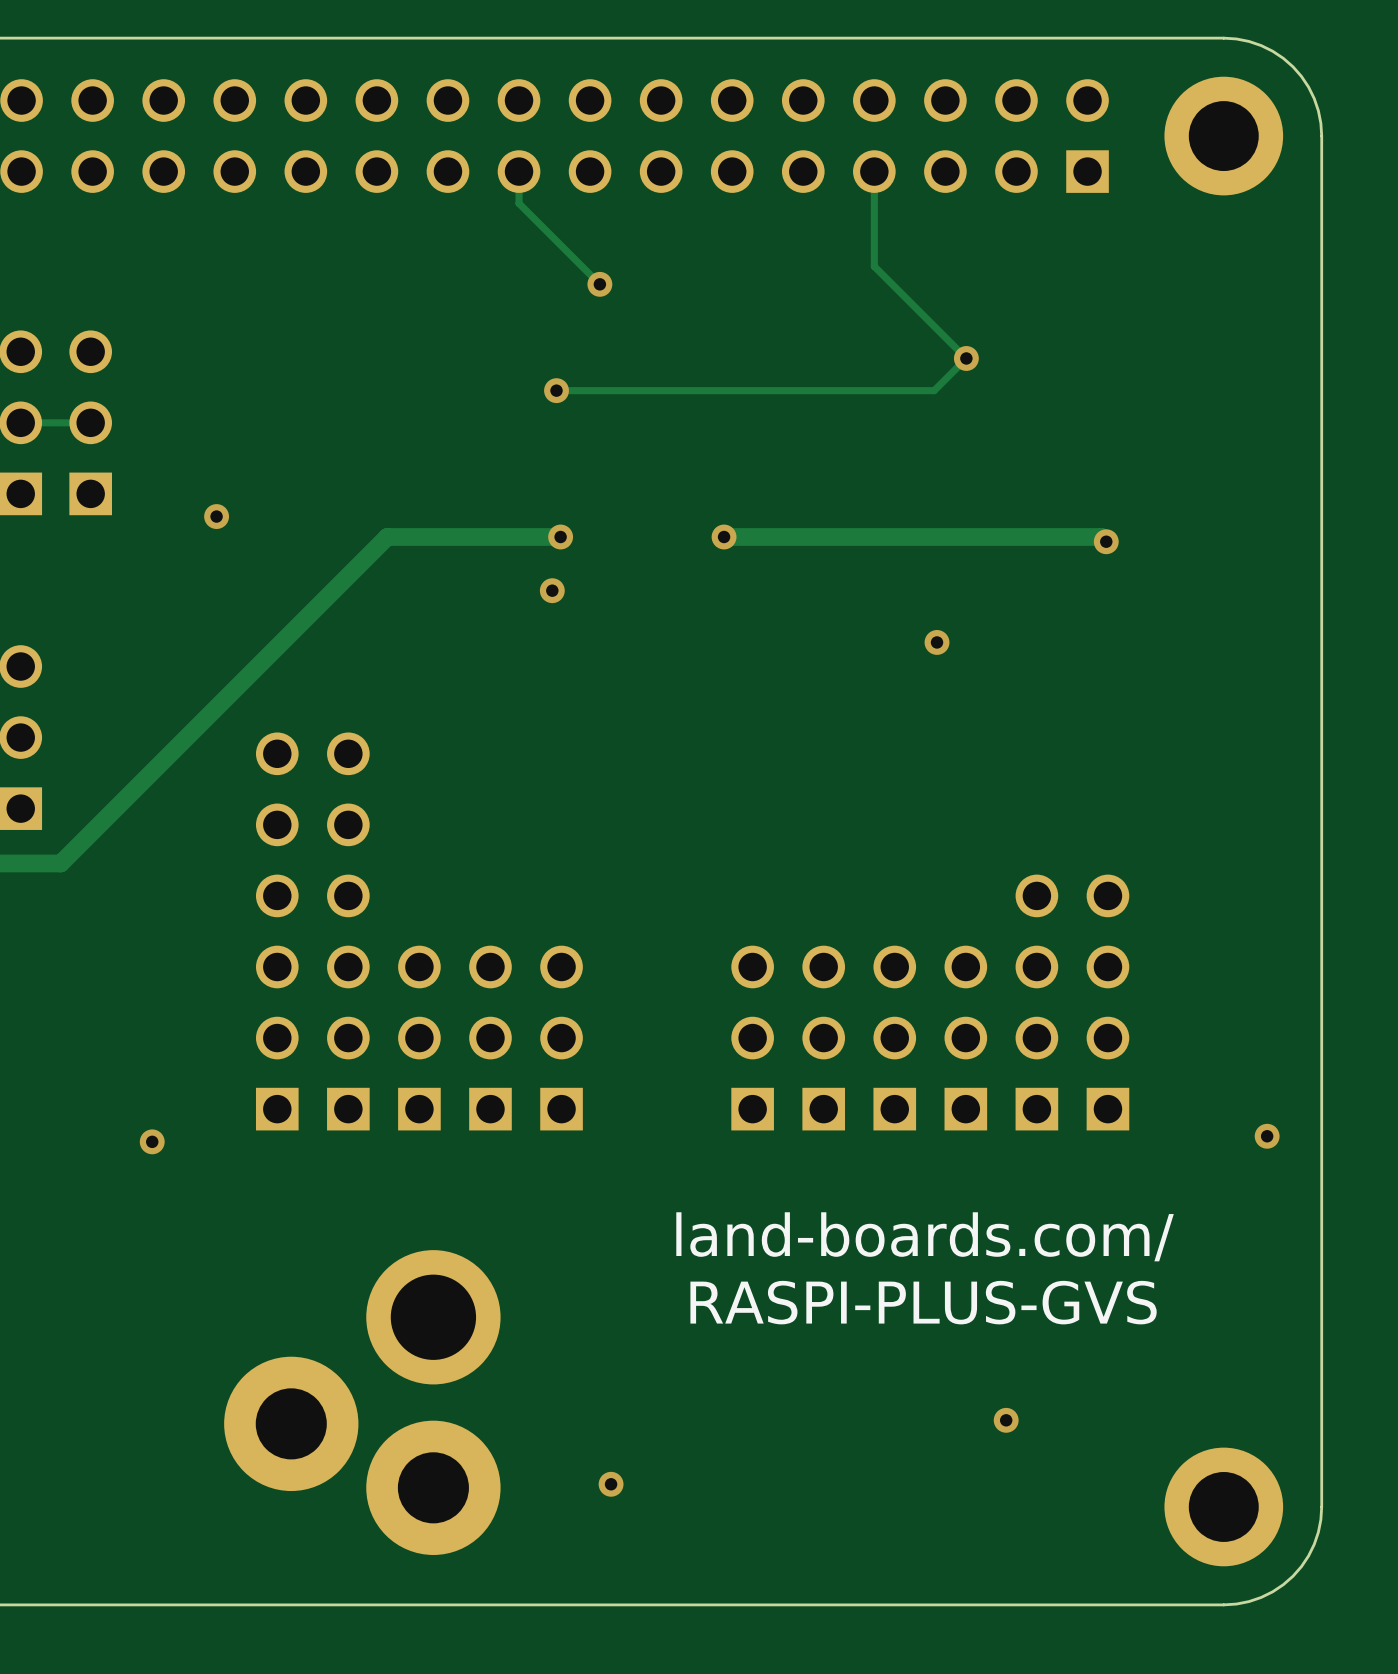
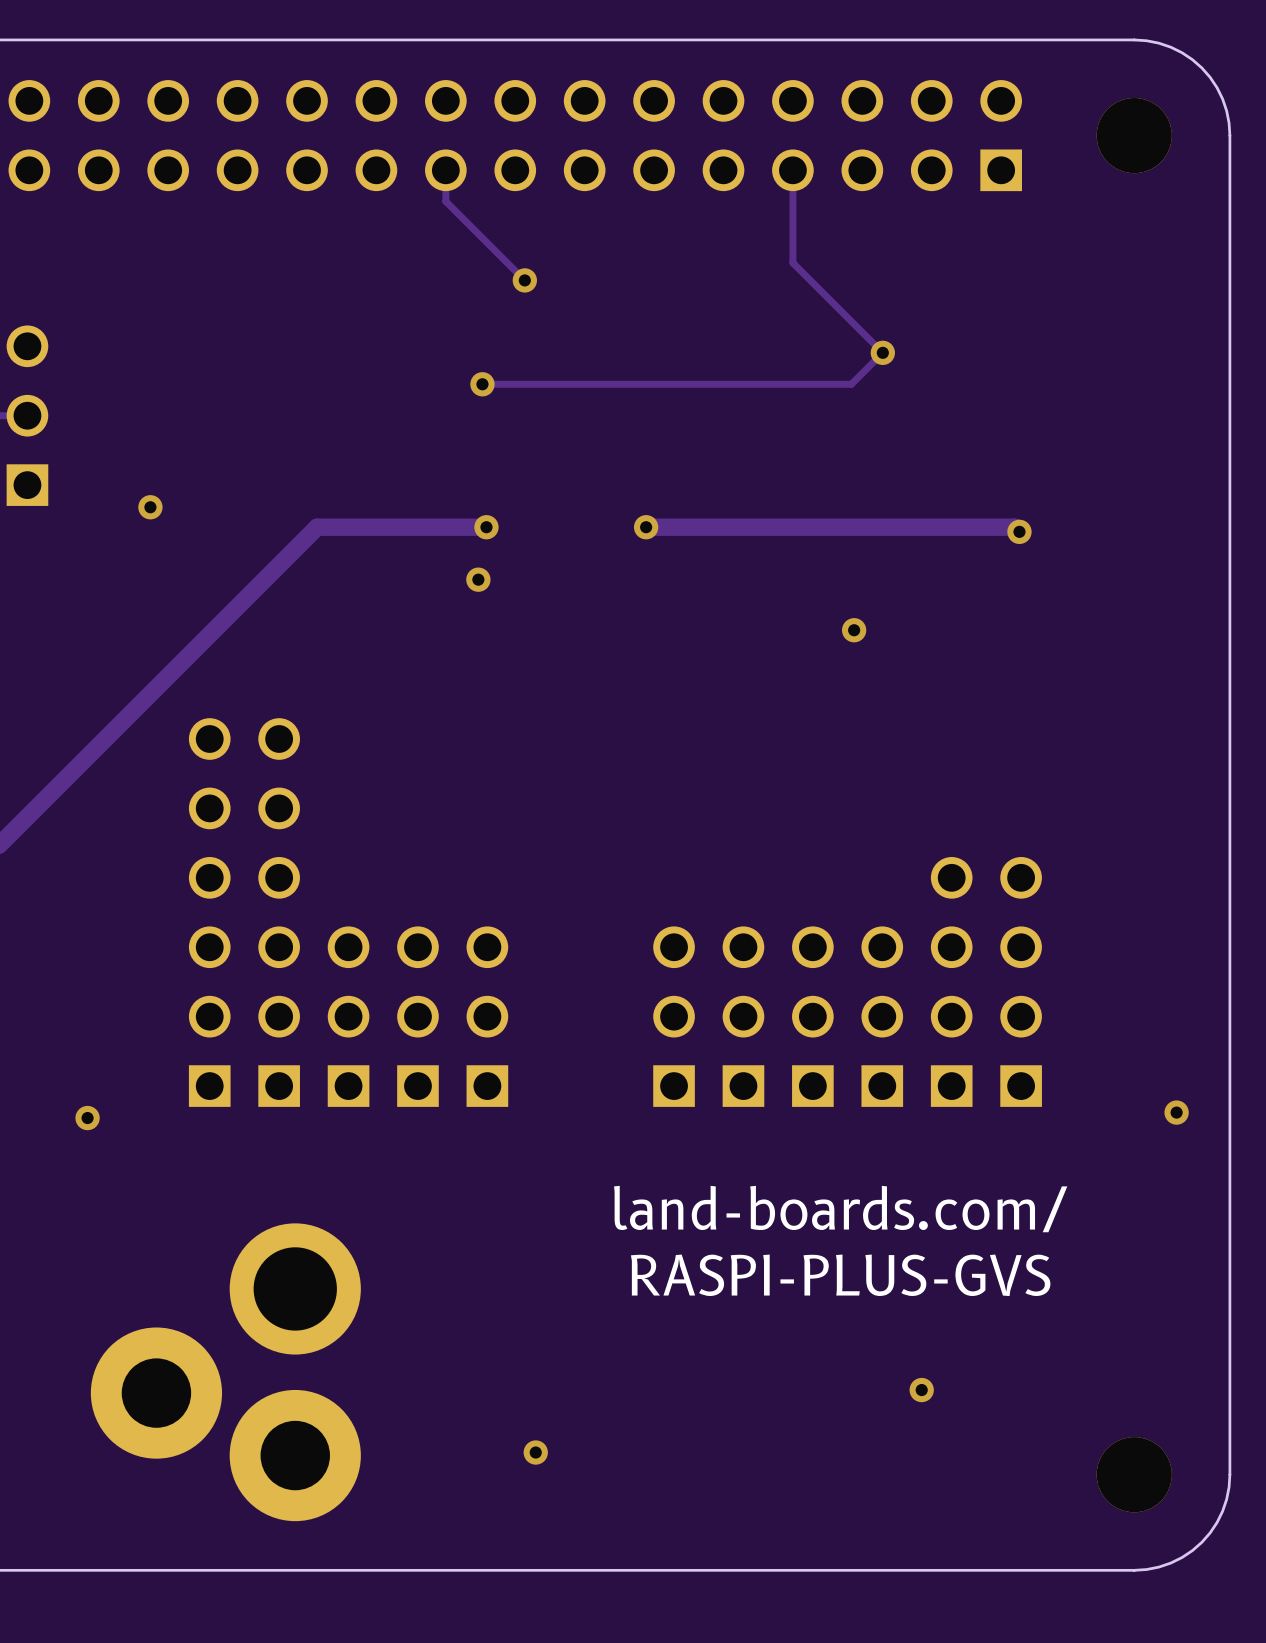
part footprint: [1164, 76, 1284, 196] -> [1096, 98, 1172, 174]
part position: (362, 1402) -> (225, 1372)
part footprint: [1164, 1447, 1284, 1567] -> [1096, 1437, 1172, 1513]

